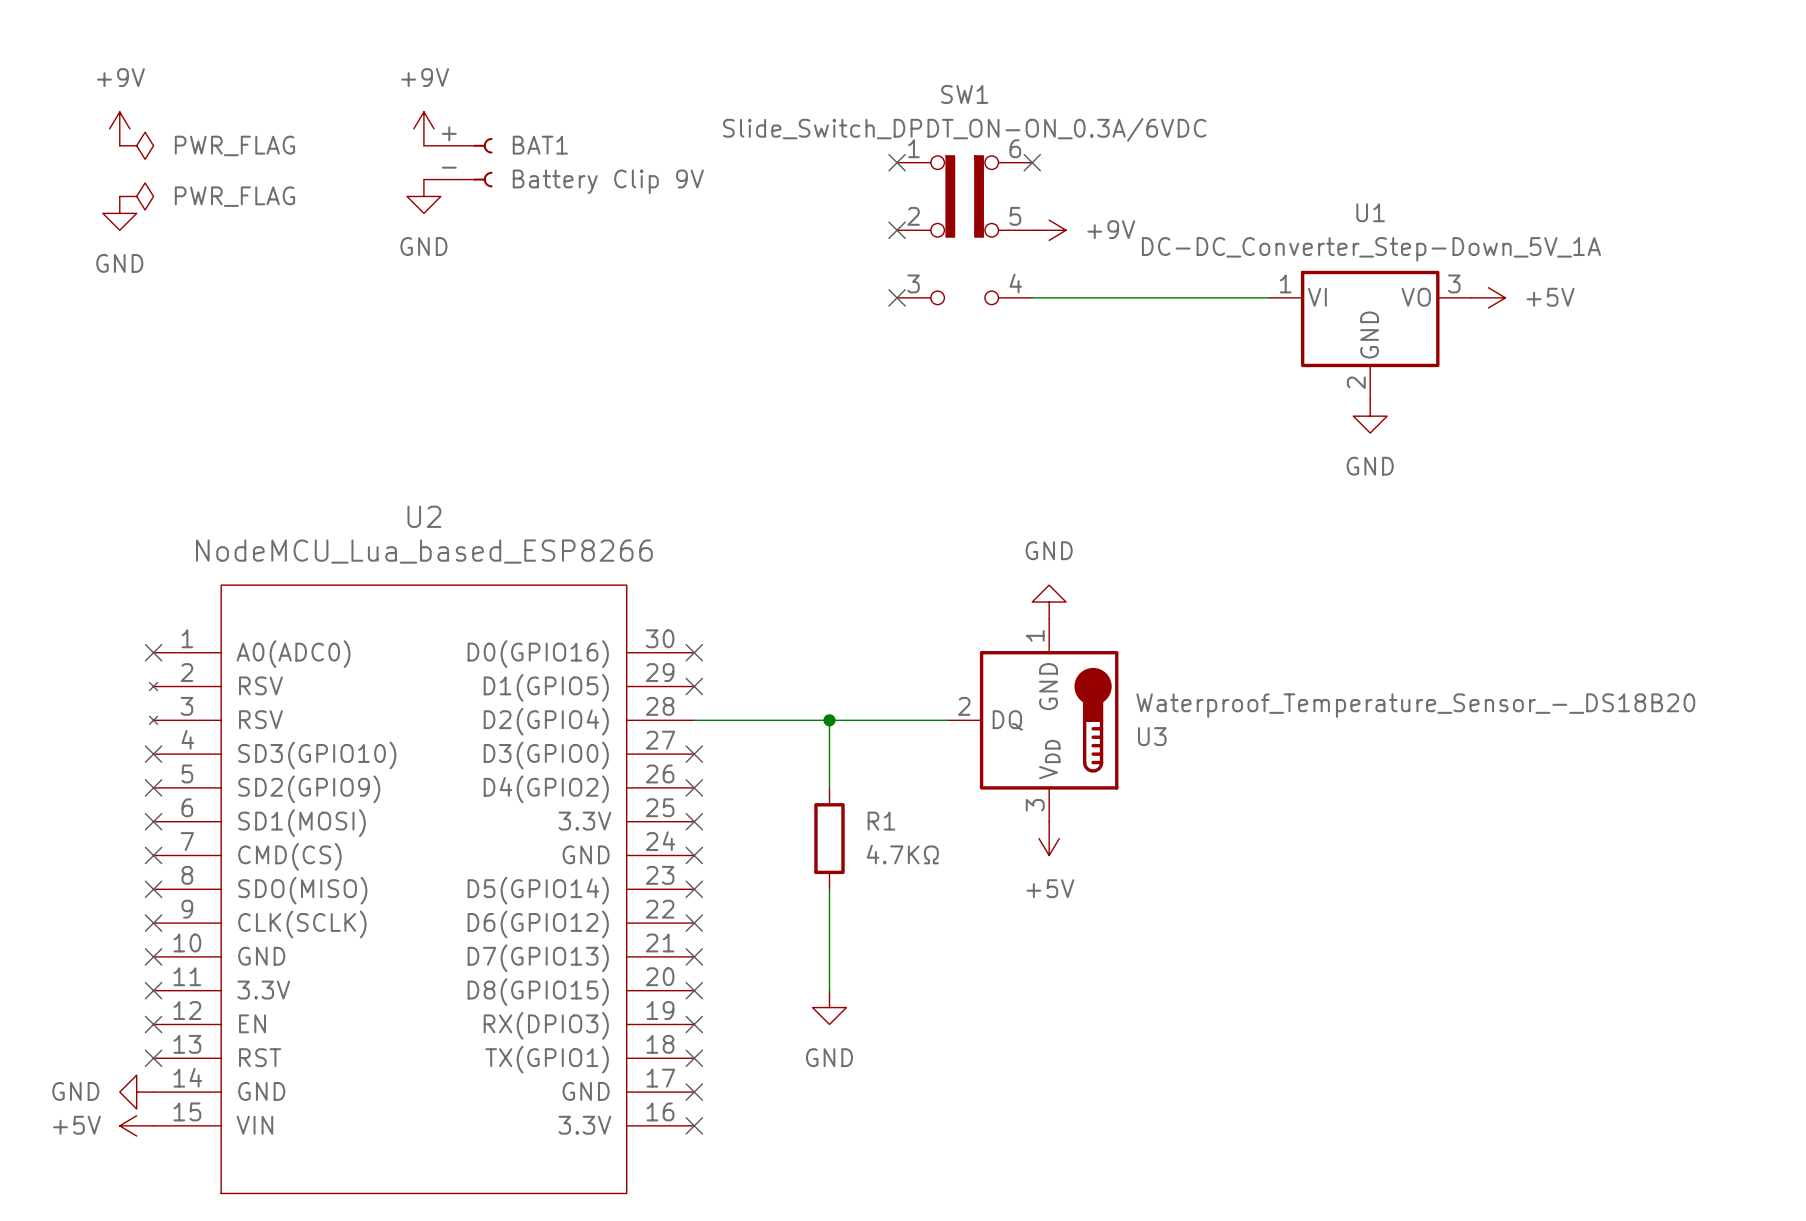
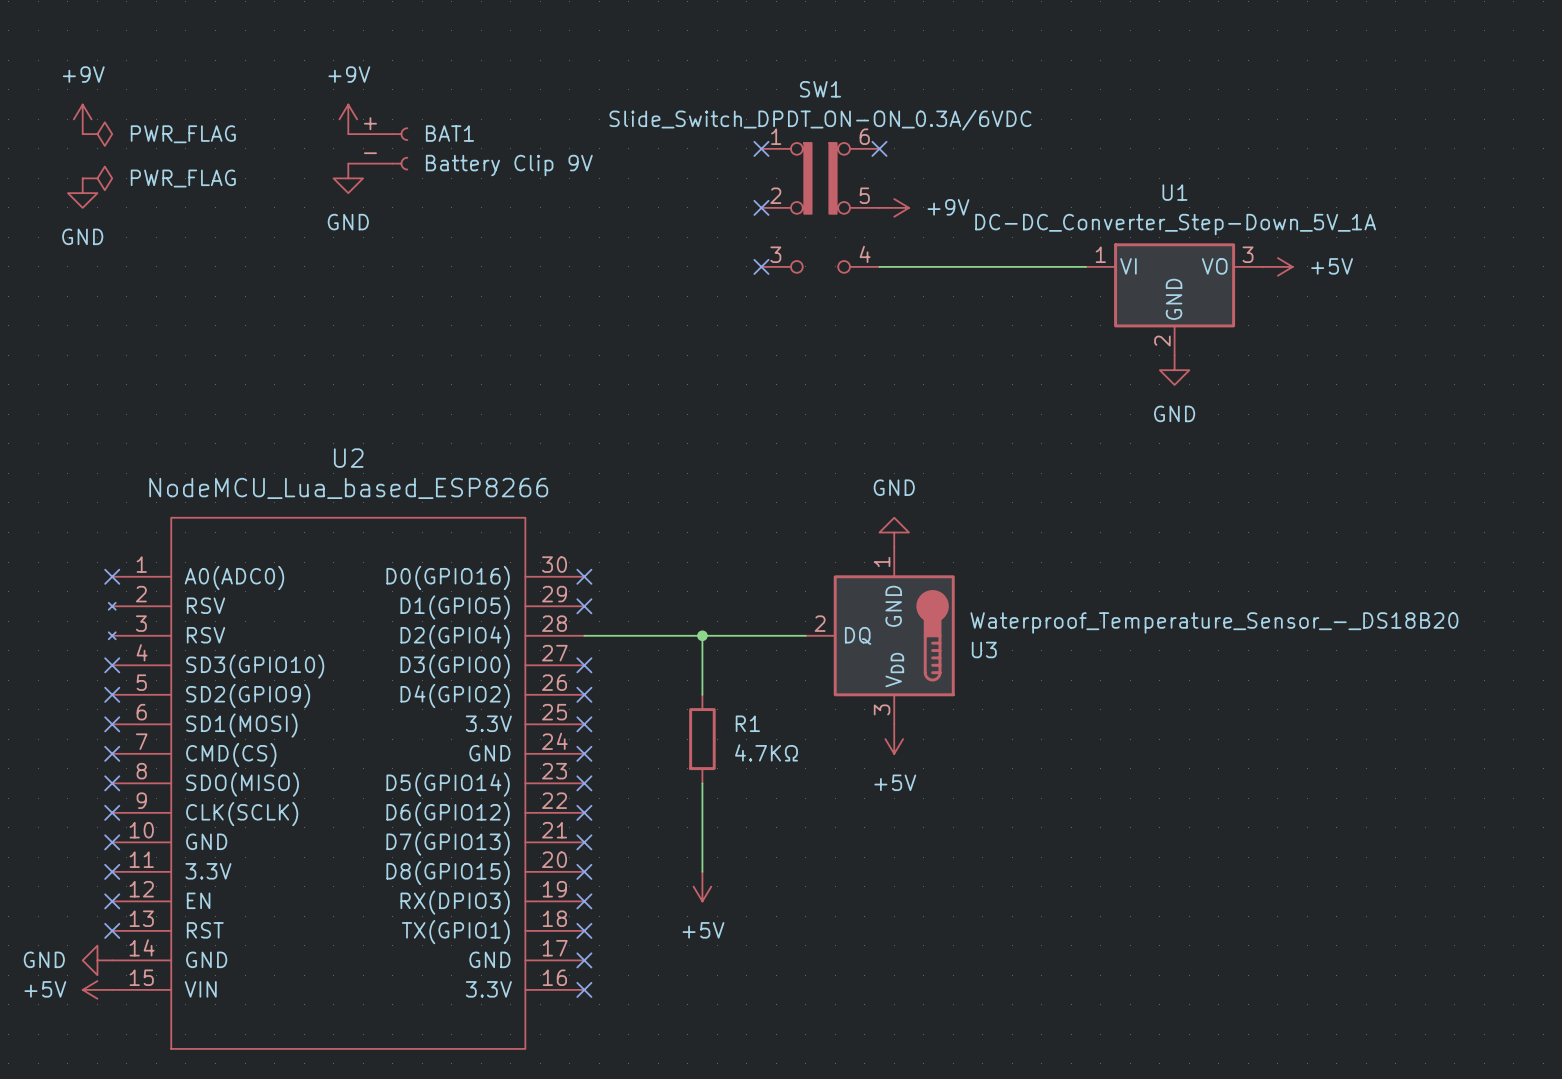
power symbol: GND (829, 1007) -> +5V (702, 886)

